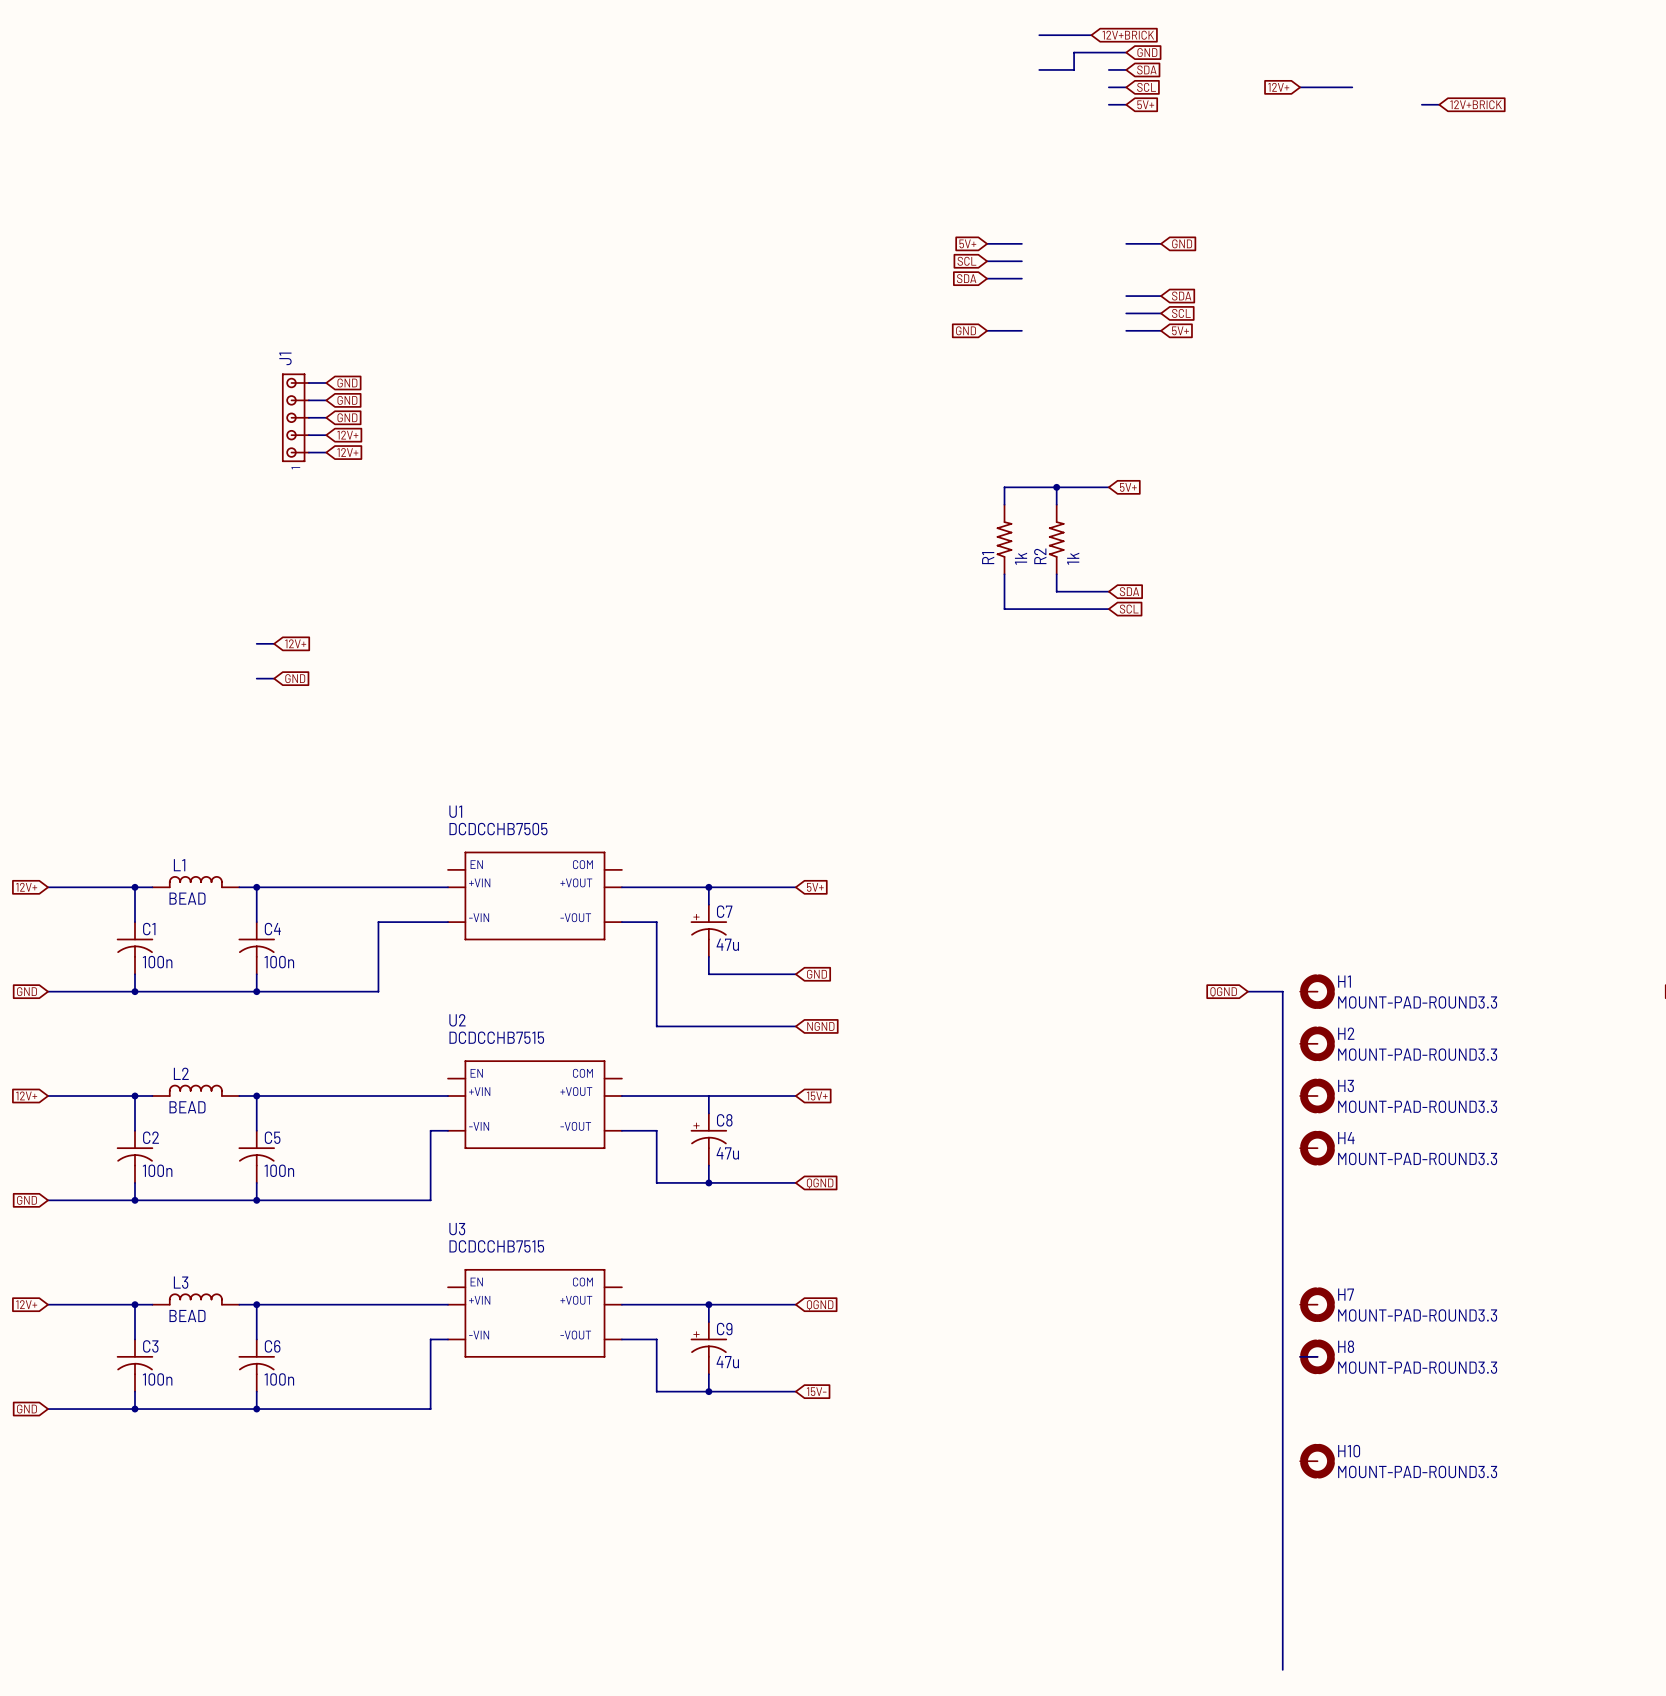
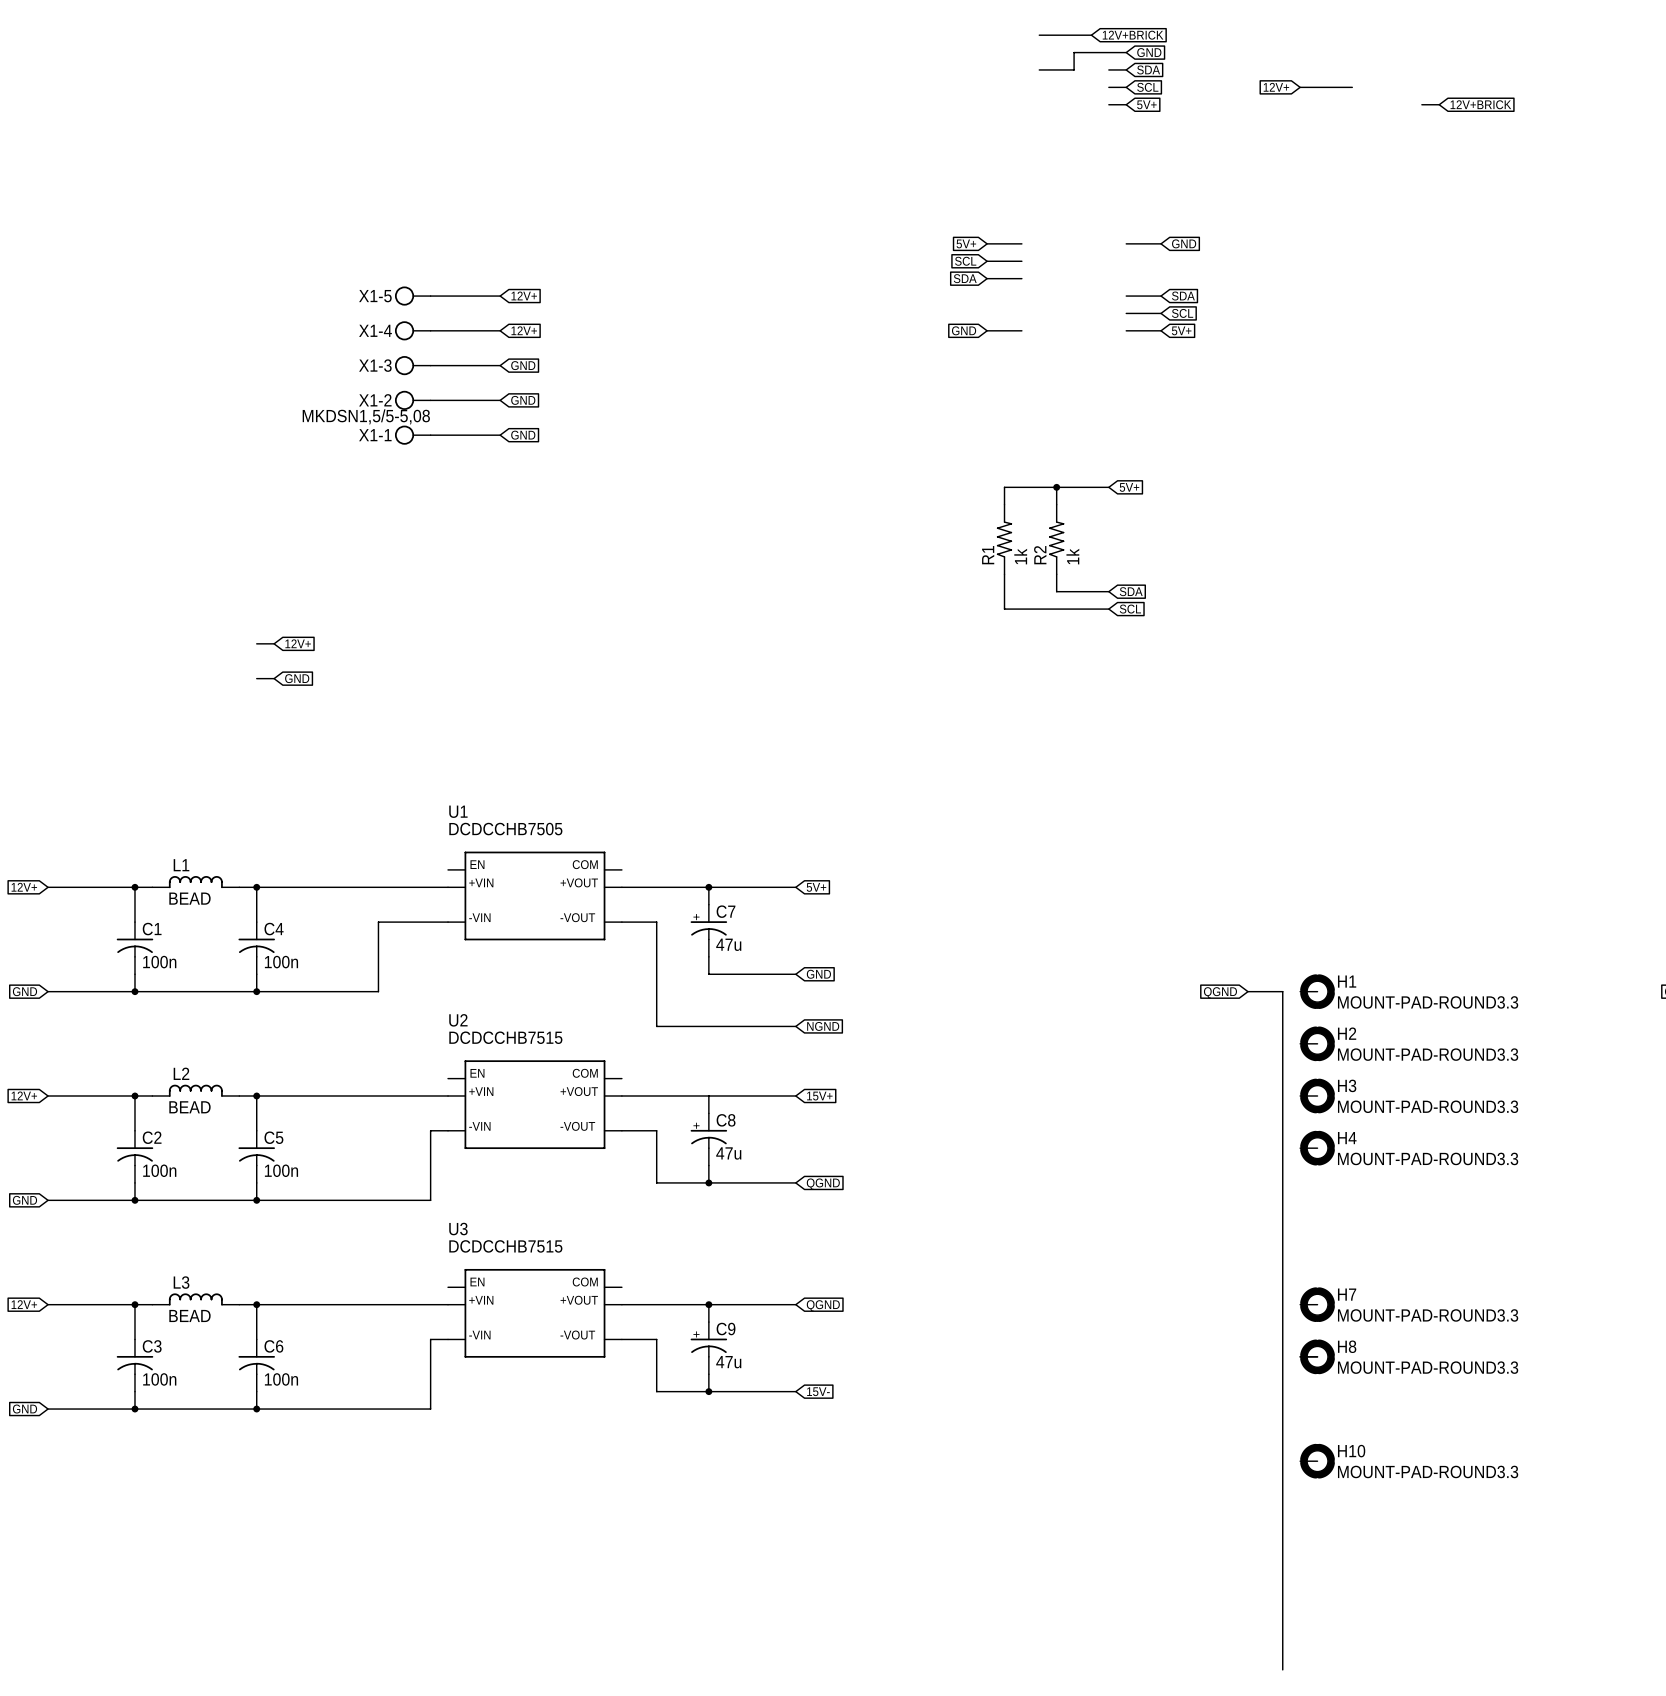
global label: none -> 12V+ (524, 295)
X1-5: none -> (412, 296)
wire: none -> (430, 296) (500, 296)
X1-4: none -> (412, 330)
wire: none -> (430, 330) (500, 330)
global label: none -> 12V+ (524, 330)
X1-3: none -> (412, 365)
wire: none -> (430, 365) (500, 365)
global label: none -> GND (523, 365)
wire: (308, 383) (326, 383) -> none
global label: GND (347, 383) -> none
wire: (308, 400) (326, 400) -> none
global label: GND (347, 400) -> none
X1-2: none -> (412, 400)
wire: none -> (430, 400) (500, 400)
global label: none -> GND (523, 400)
J1: (295, 417) -> none
wire: (308, 417) (326, 417) -> none
global label: GND (347, 417) -> none
wire: (308, 435) (326, 435) -> none
global label: 12V+ (347, 435) -> none
X1-1: none -> MKDSN1,5/5-5,08 (412, 435)
wire: none -> (430, 435) (500, 435)
global label: none -> GND (523, 435)
wire: (308, 452) (326, 452) -> none
global label: 12V+ (347, 452) -> none

